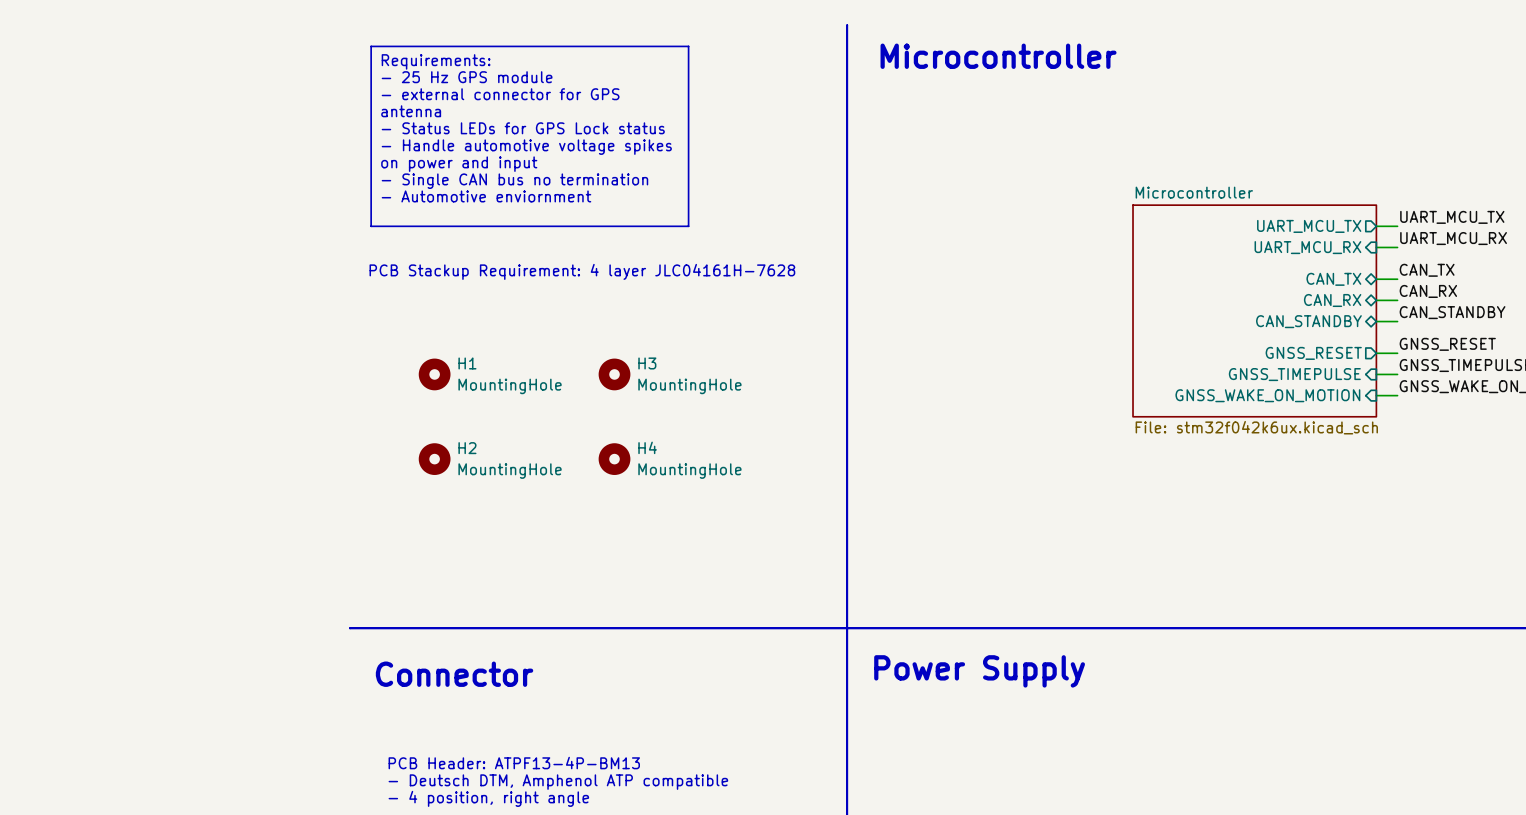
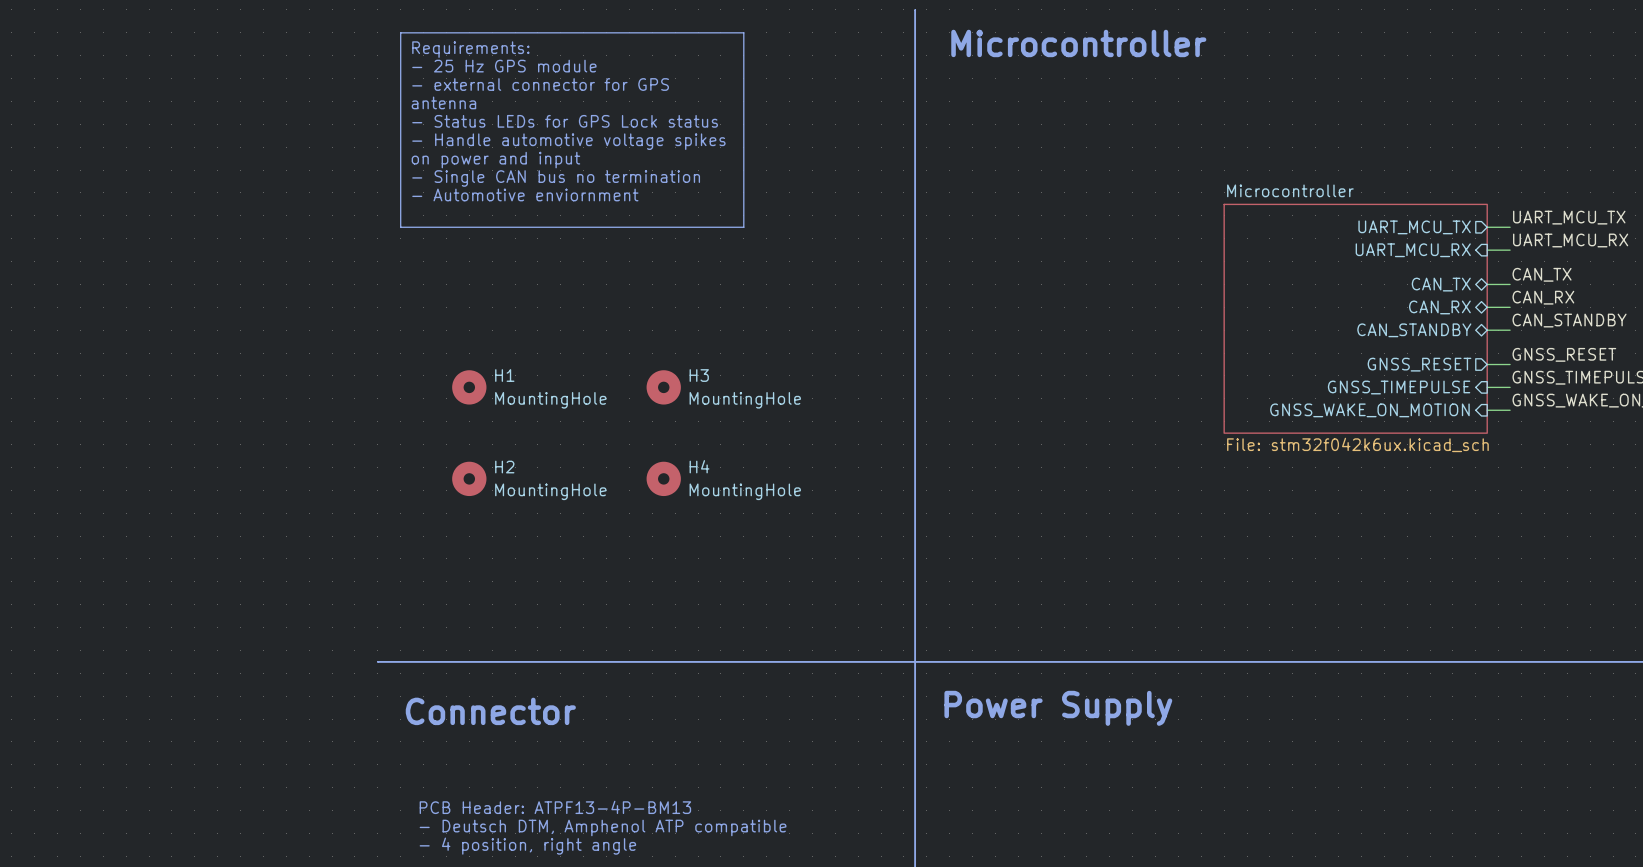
text: PCB Stackup Requirement: 4 layer JLC04161H-7628 (582, 271) -> none

